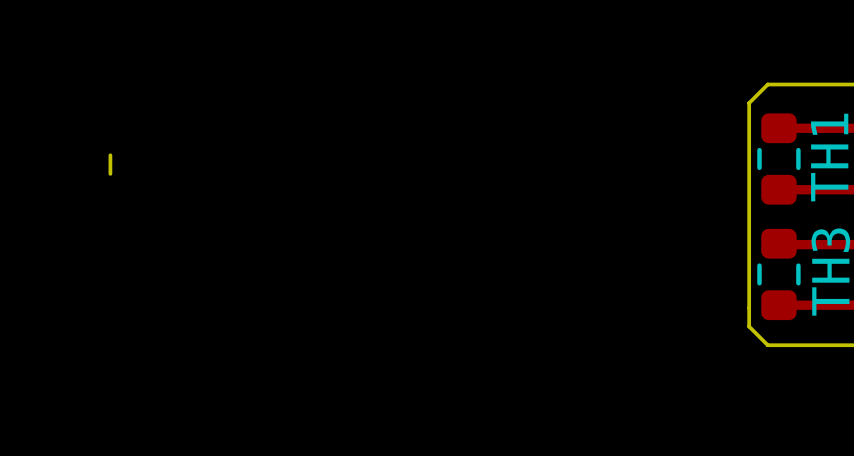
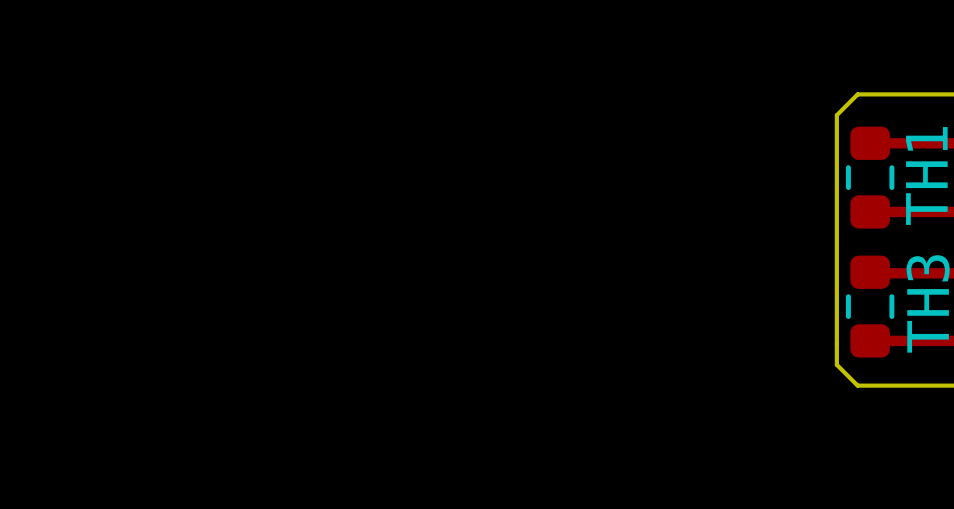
board edge: (110, 155) (110, 173) -> none

